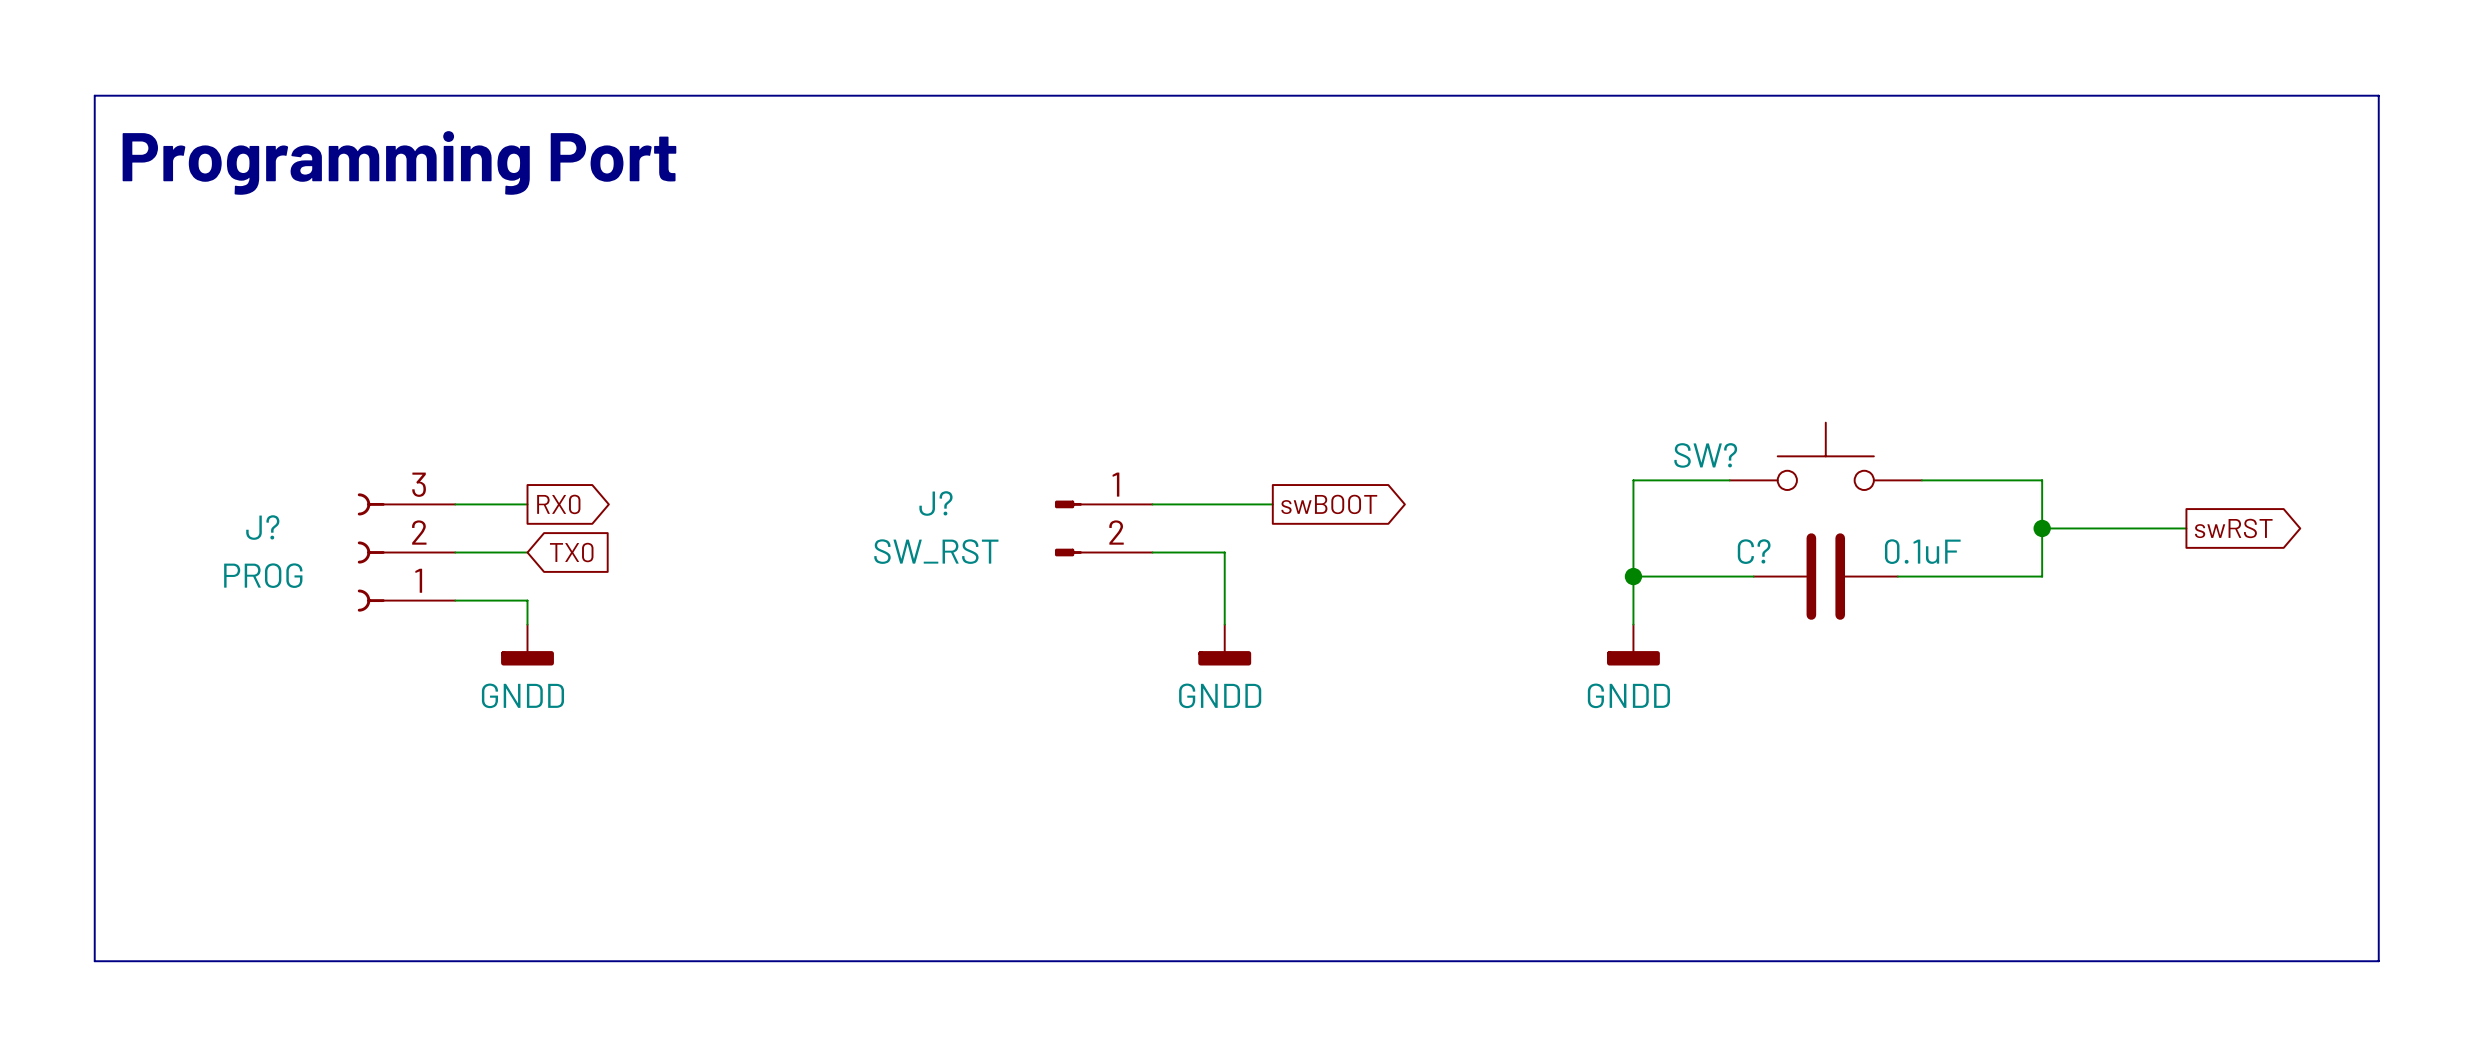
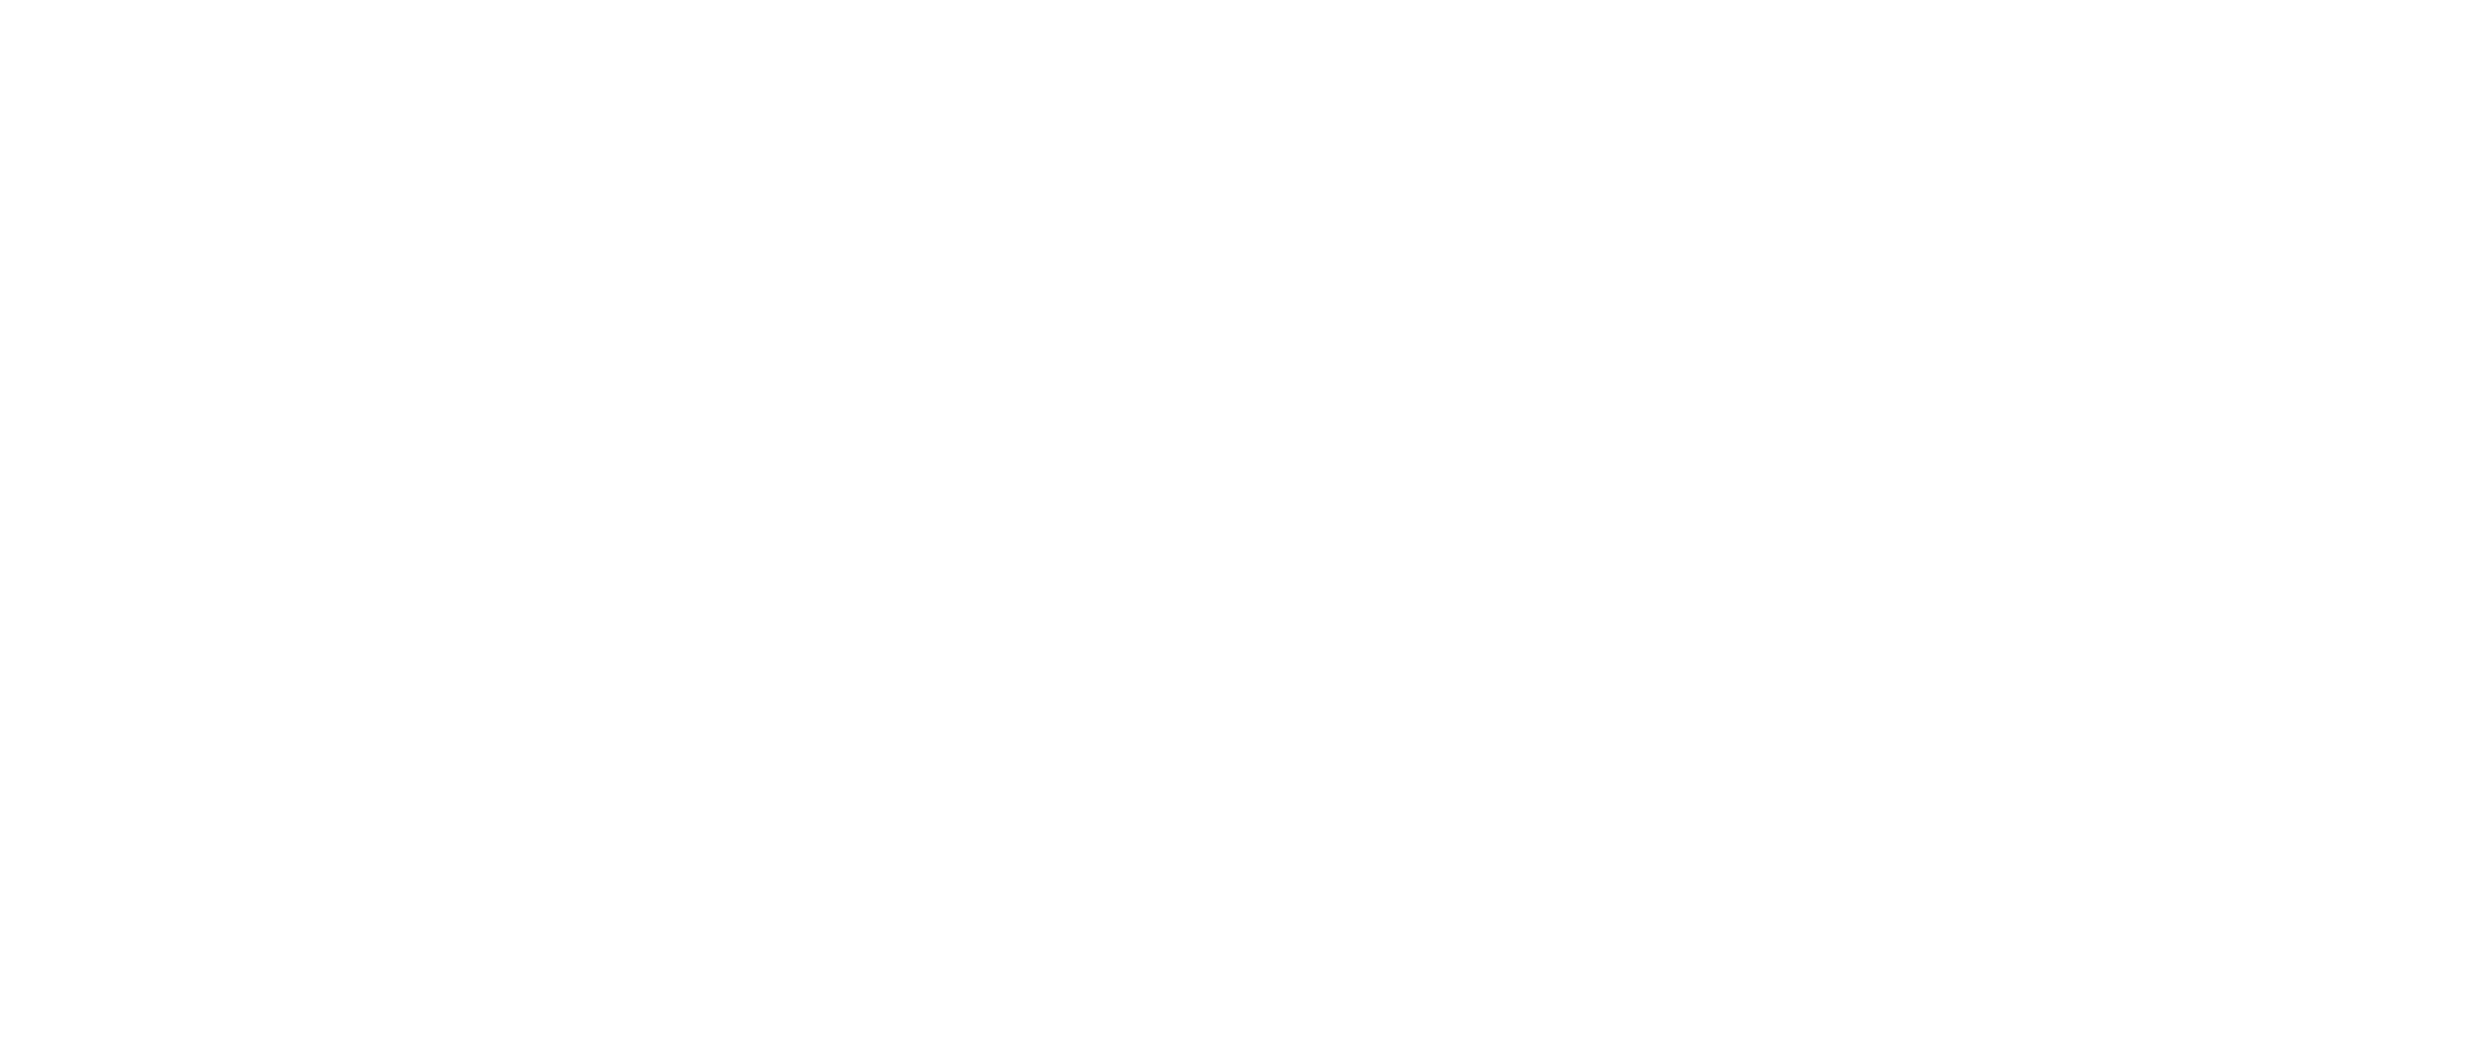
line: (94, 95) (94, 961) (2378, 961) (2378, 95) (94, 95) -> none
text: Programming Port (399, 162) -> none
SW?: (1825, 456) -> none
wire: (1729, 480) (1633, 480) (1633, 624) -> none
wire: (1921, 480) (2042, 480) (2042, 576) (1897, 576) -> none
wire: (455, 504) (527, 504) -> none
global label: RX0 (558, 504) -> none
wire: (1152, 504) (1272, 504) -> none
global label: swBOOT (1329, 504) -> none
J?: SW_RST (1103, 528) -> none
wire: (2042, 528) (2186, 528) -> none
junction: (2042, 528) -> none
global label: swRST (2233, 528) -> none
J?: PROG (406, 552) -> none
wire: (455, 552) (527, 552) -> none
global label: TX0 (571, 552) -> none
wire: (1152, 552) (1224, 552) (1224, 624) -> none
wire: (1633, 576) (1753, 576) -> none
junction: (1633, 576) -> none
C?: 0.1uF (1825, 576) -> none
wire: (455, 600) (527, 600) (527, 624) -> none
power symbol: GNDD (527, 645) -> none
power symbol: GNDD (1224, 645) -> none
power symbol: GNDD (1633, 645) -> none

